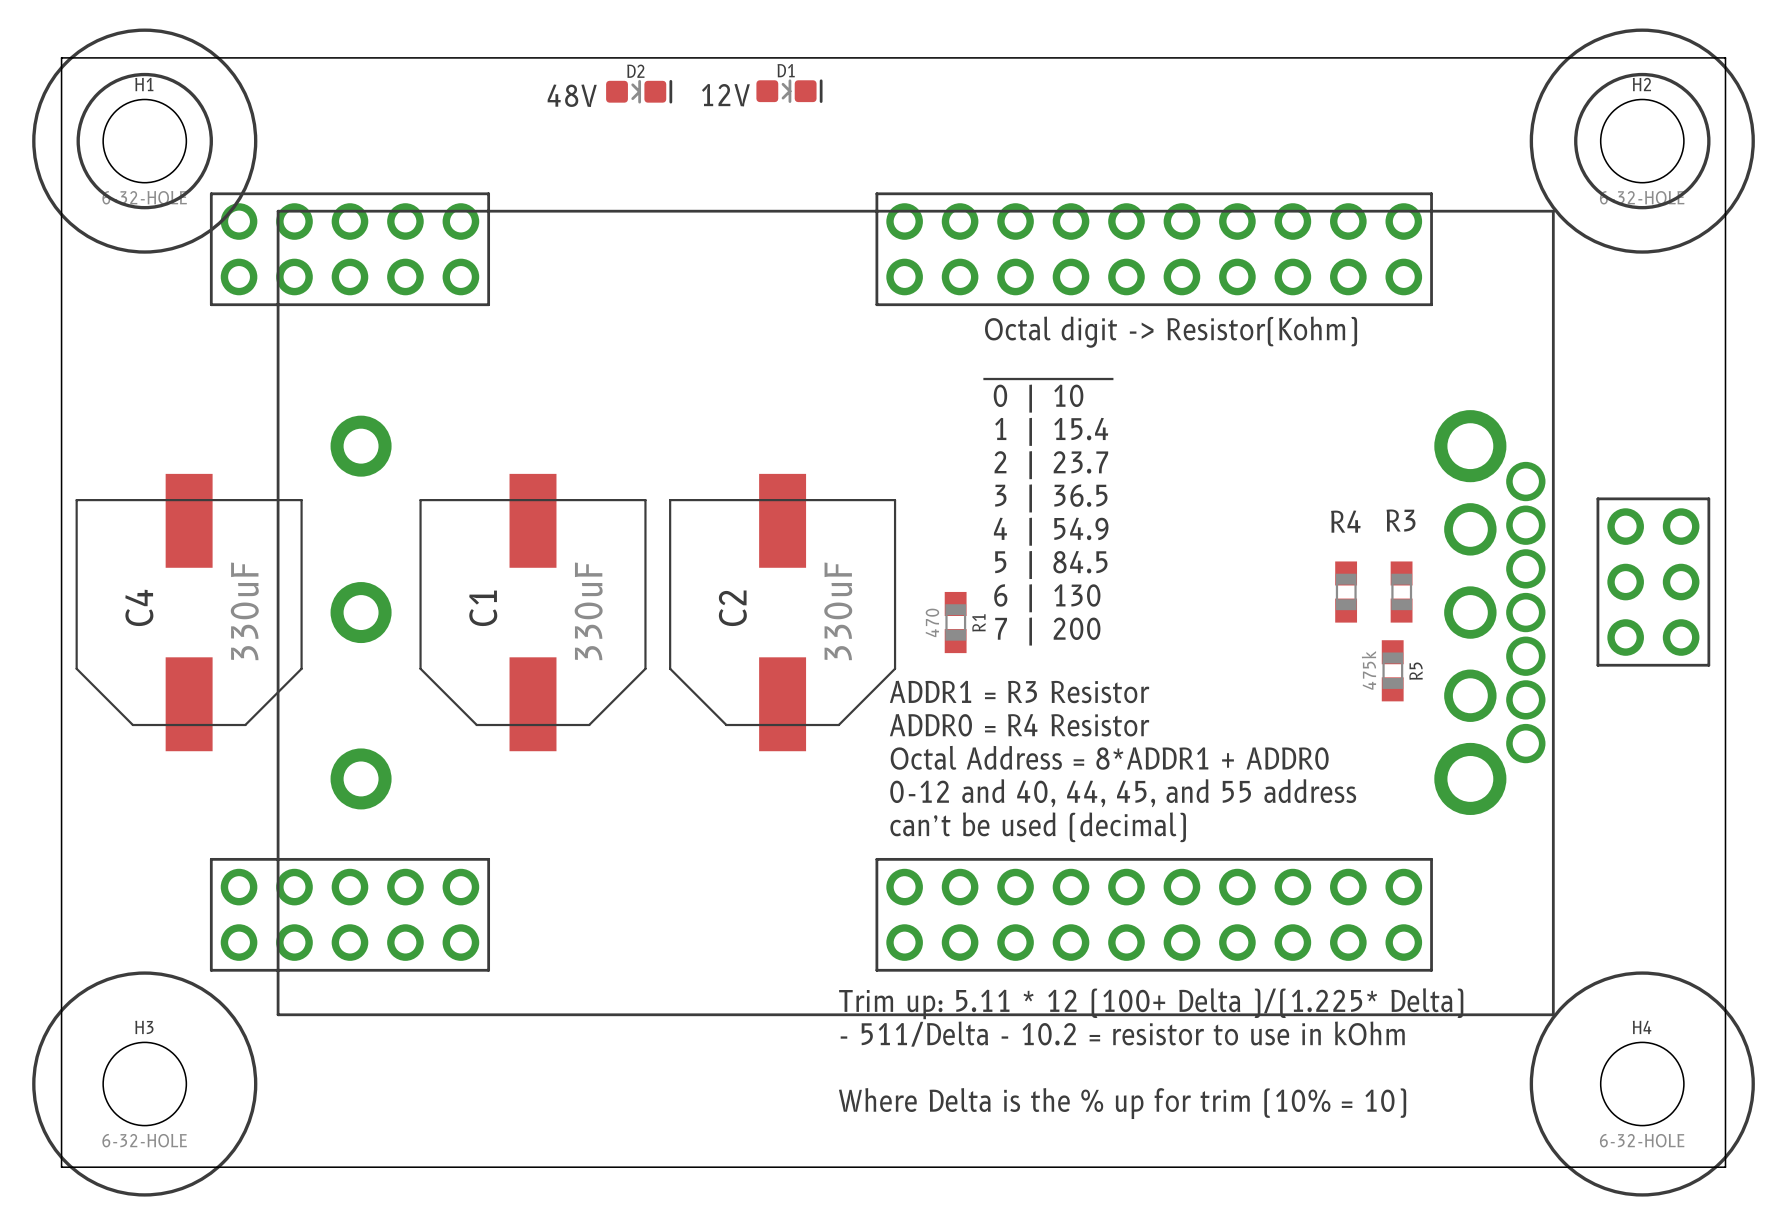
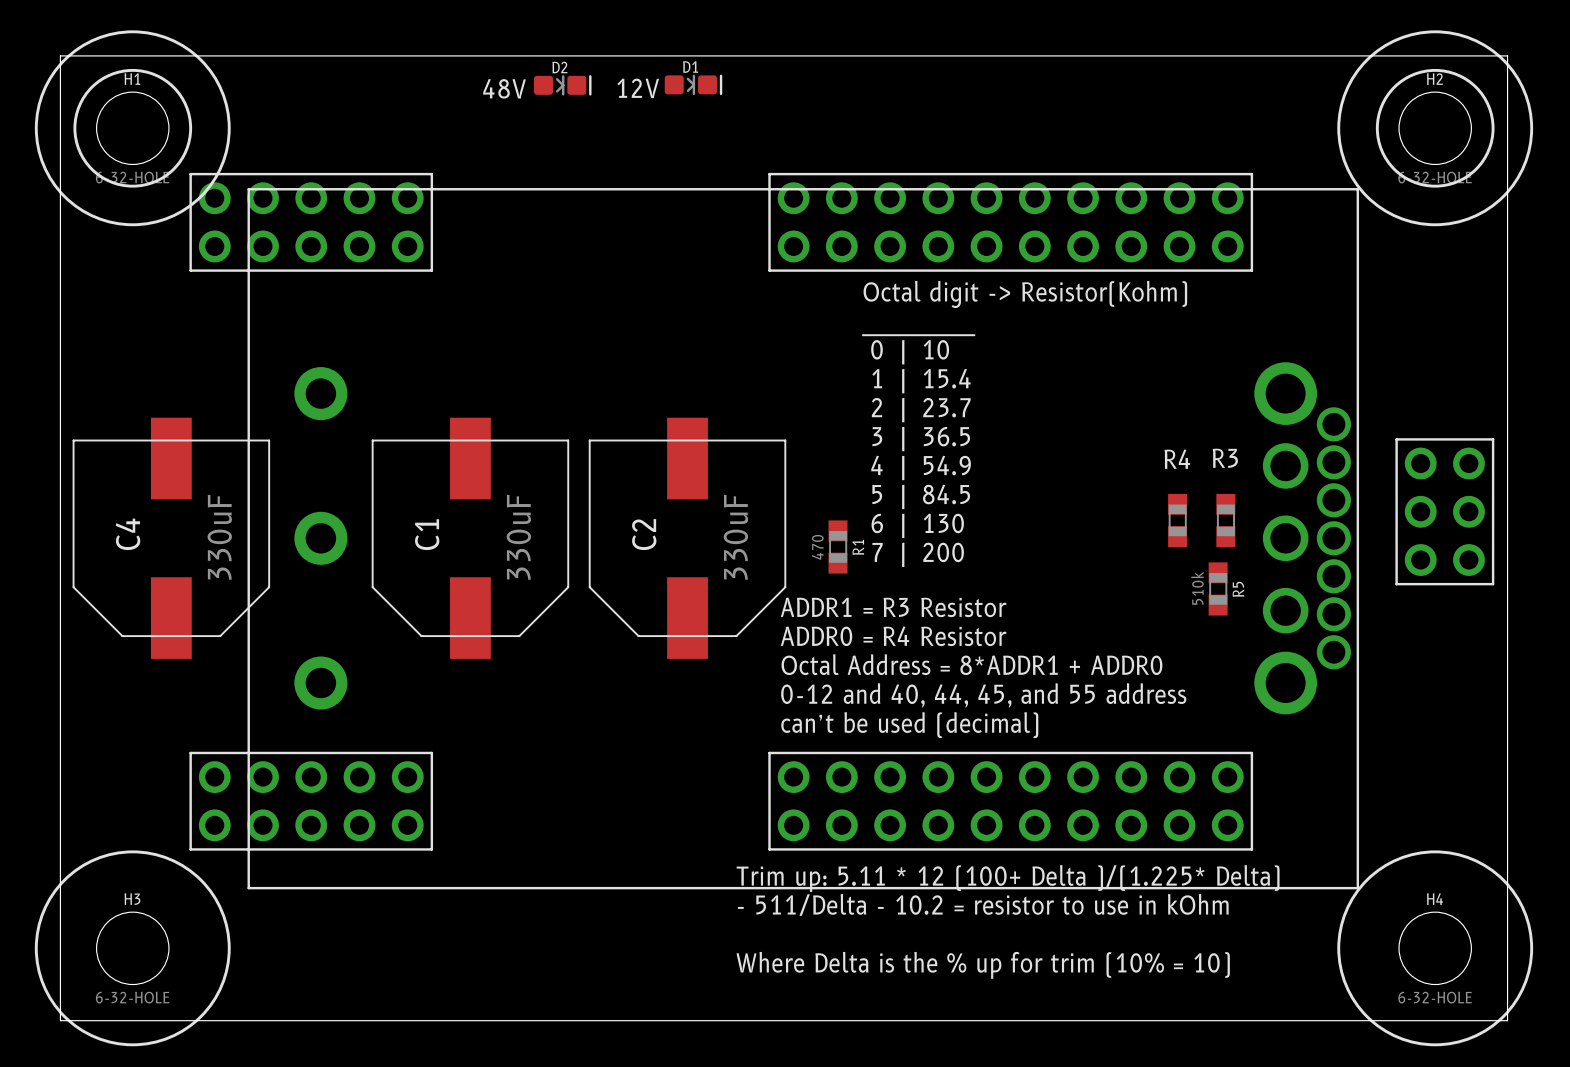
R5 value: 475k (1368, 670) -> 510k (1197, 588)

